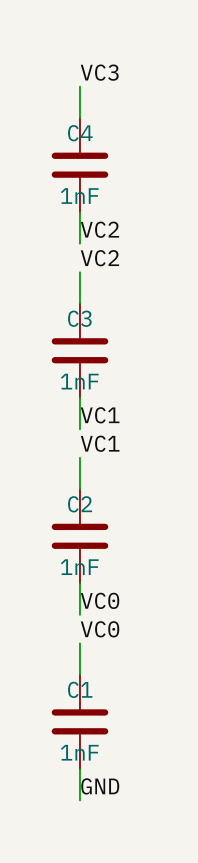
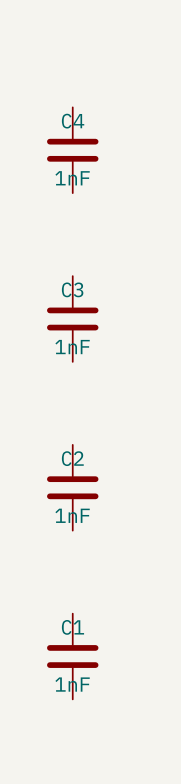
label: VC3 (99, 72) -> none
wire: (79, 86) (79, 118) -> none
wire: (79, 212) (79, 243) -> none
label: VC2 (99, 229) -> none
label: VC2 (99, 258) -> none
wire: (79, 272) (79, 303) -> none
wire: (79, 397) (79, 429) -> none
label: VC1 (100, 415) -> none
label: VC1 (100, 443) -> none
wire: (79, 457) (79, 489) -> none
wire: (79, 583) (79, 614) -> none
label: VC0 (100, 600) -> none
label: VC0 (100, 629) -> none
wire: (79, 643) (79, 674) -> none
wire: (79, 769) (79, 800) -> none
label: GND (100, 786) -> none

